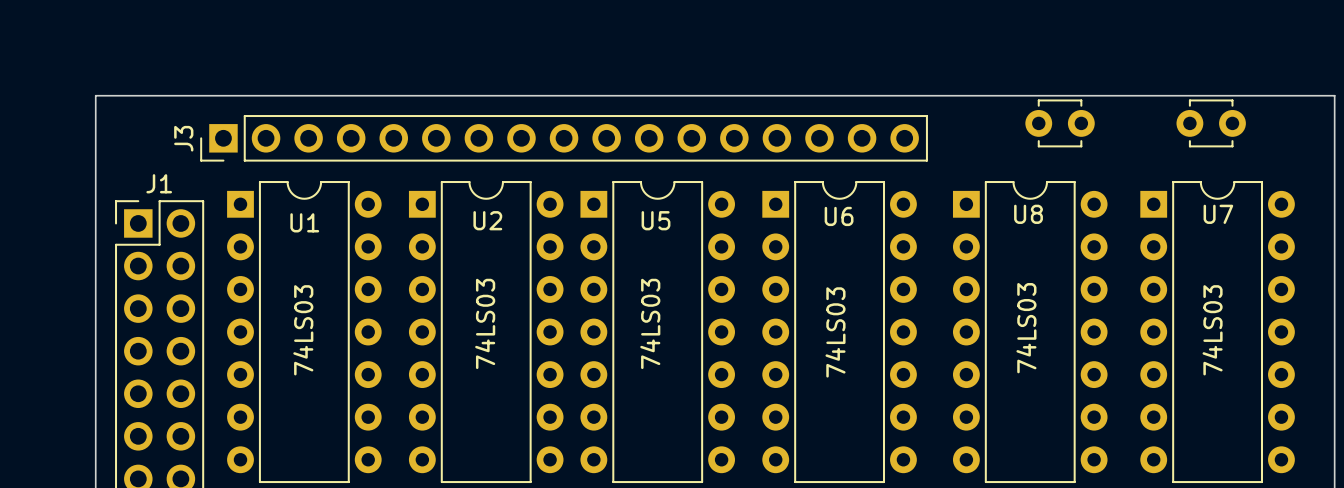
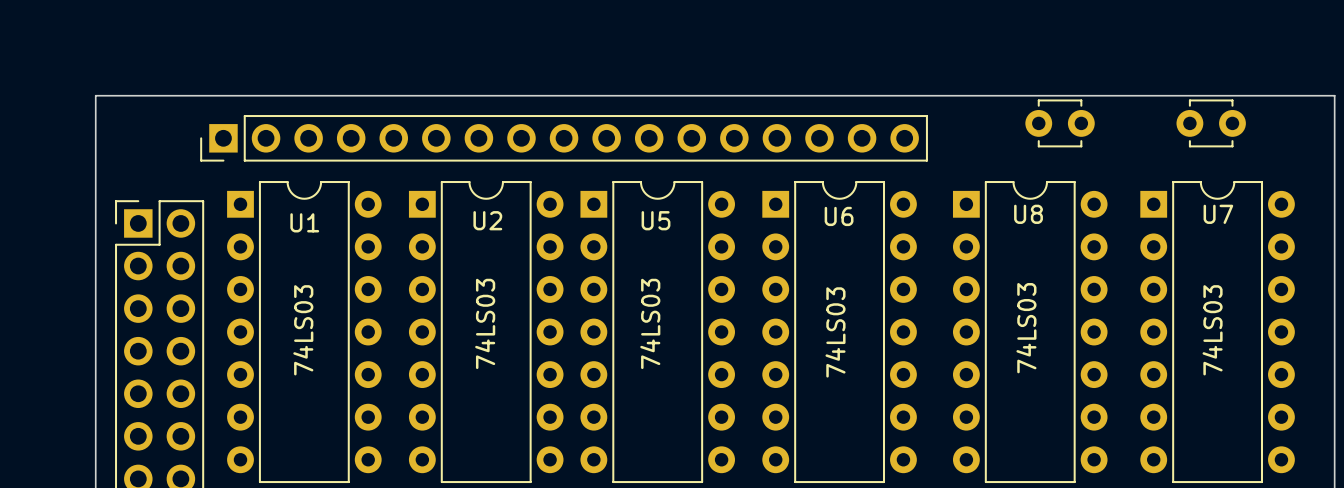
J3 name: J3 (183, 138) -> none
J1 name: J1 (159, 183) -> none

